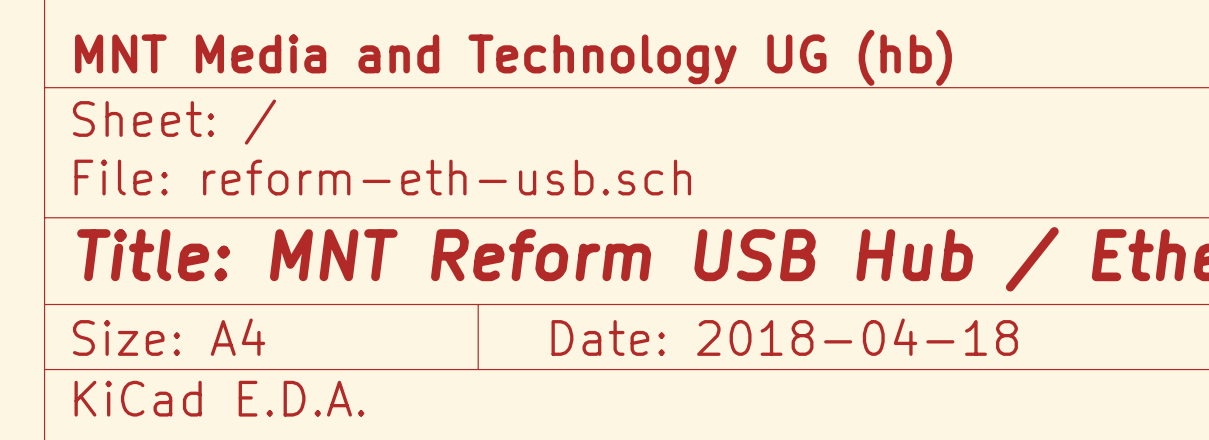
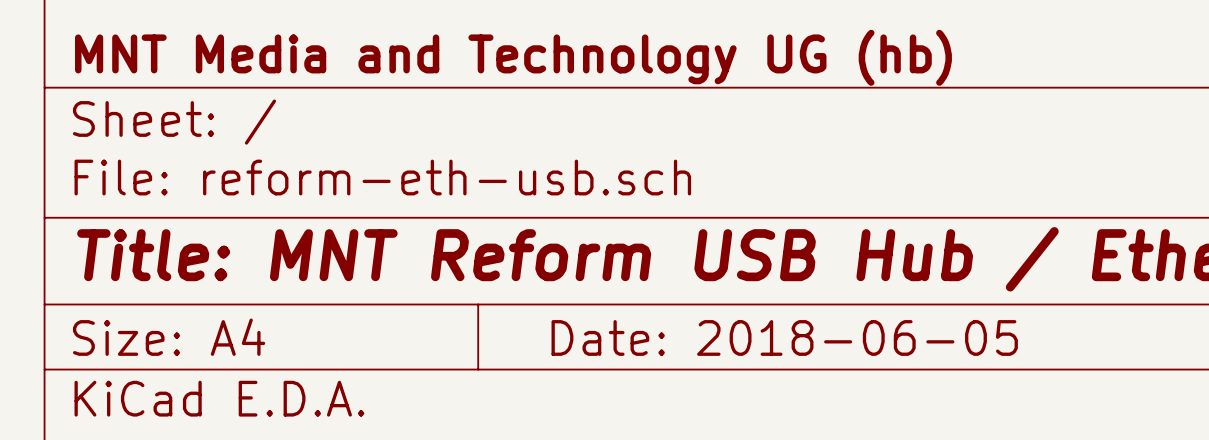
title block: Date: 2018-04-18 (784, 337) -> Date: 2018-06-05 (784, 337)

